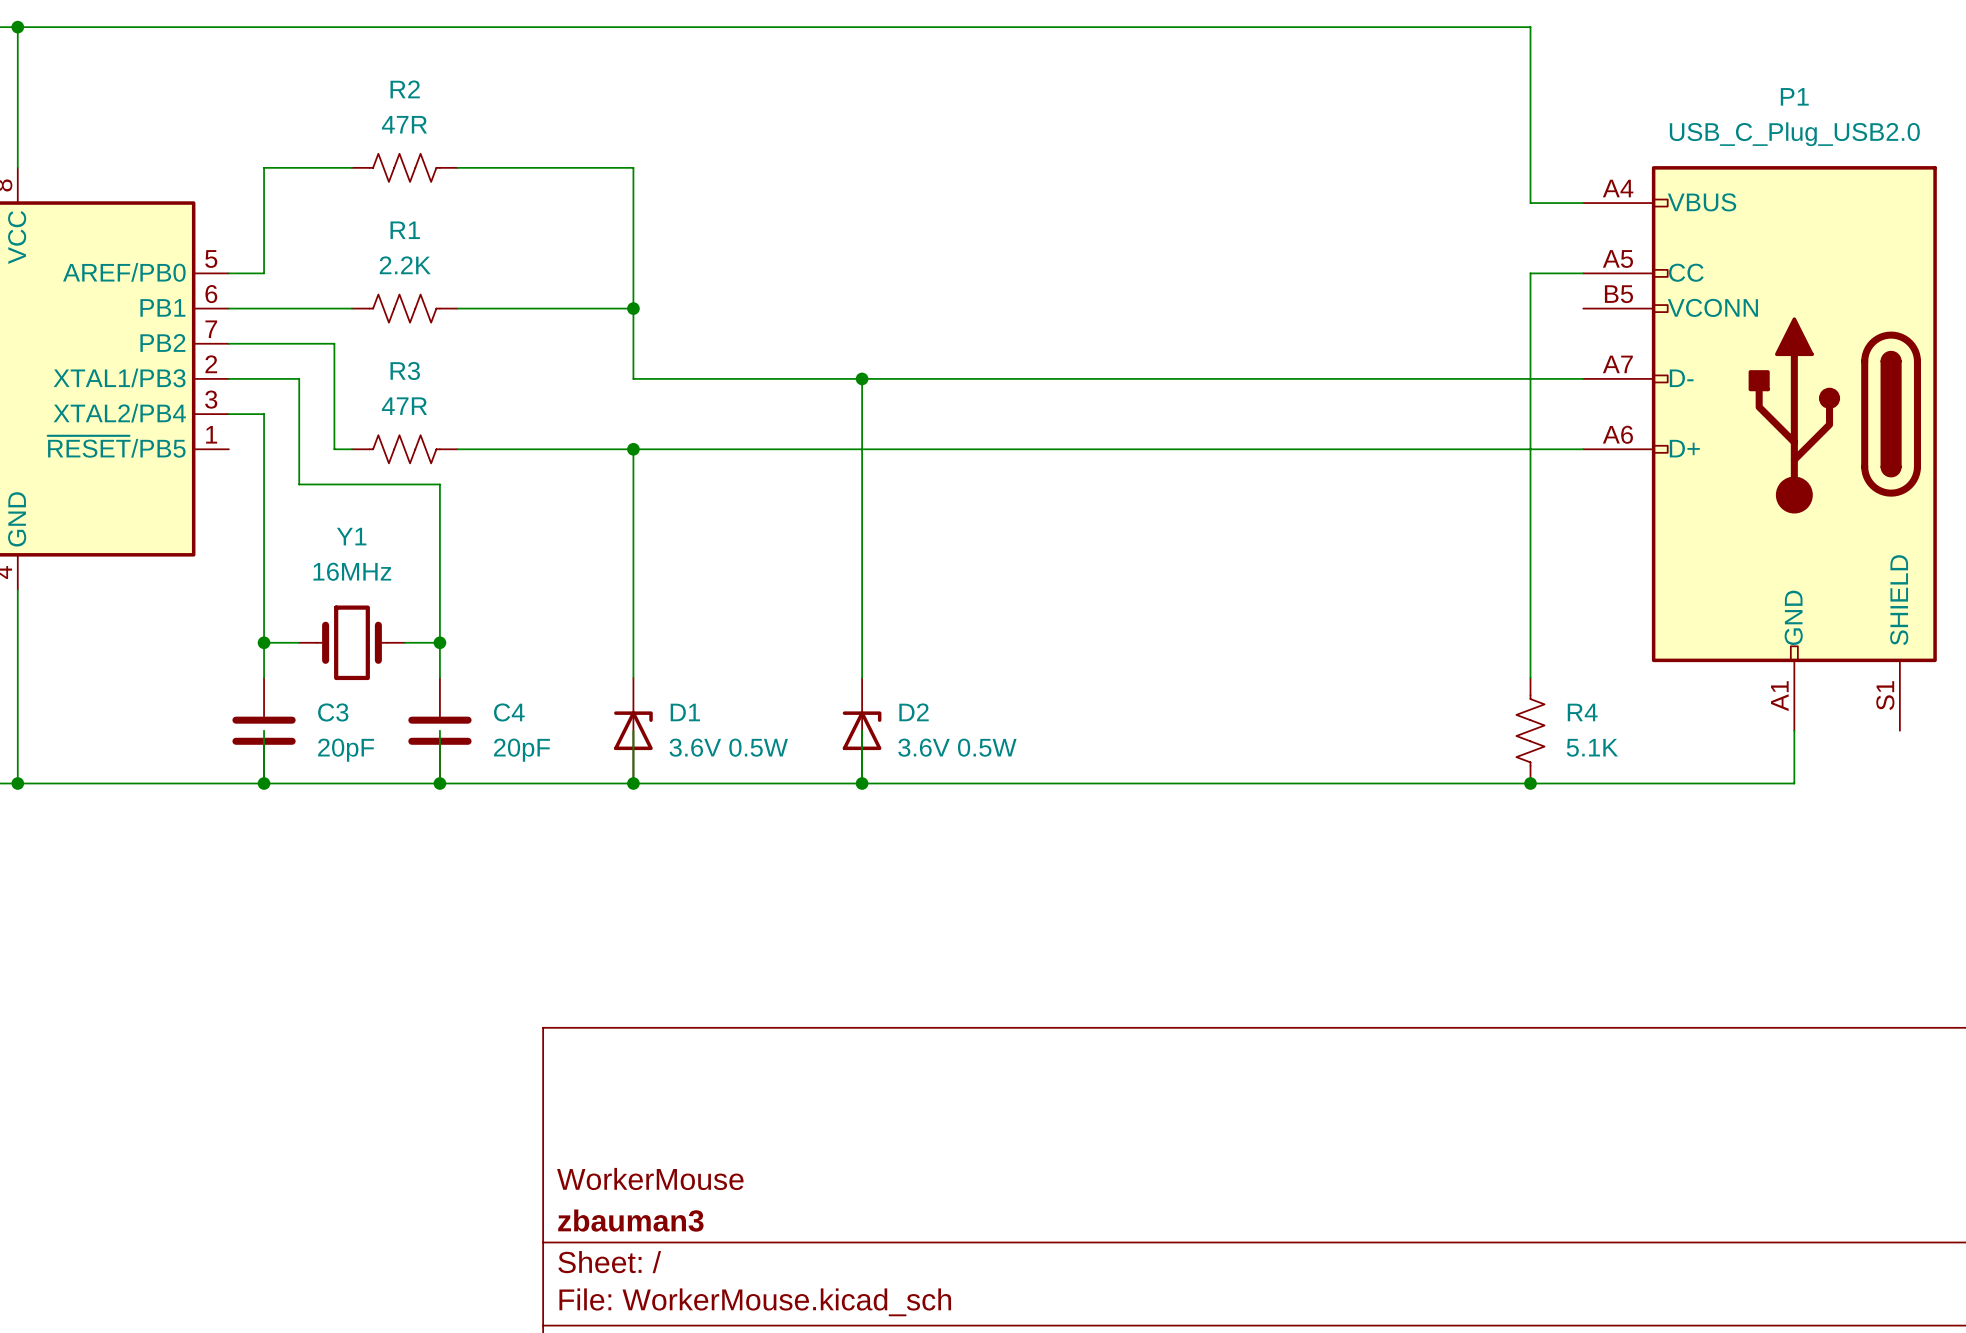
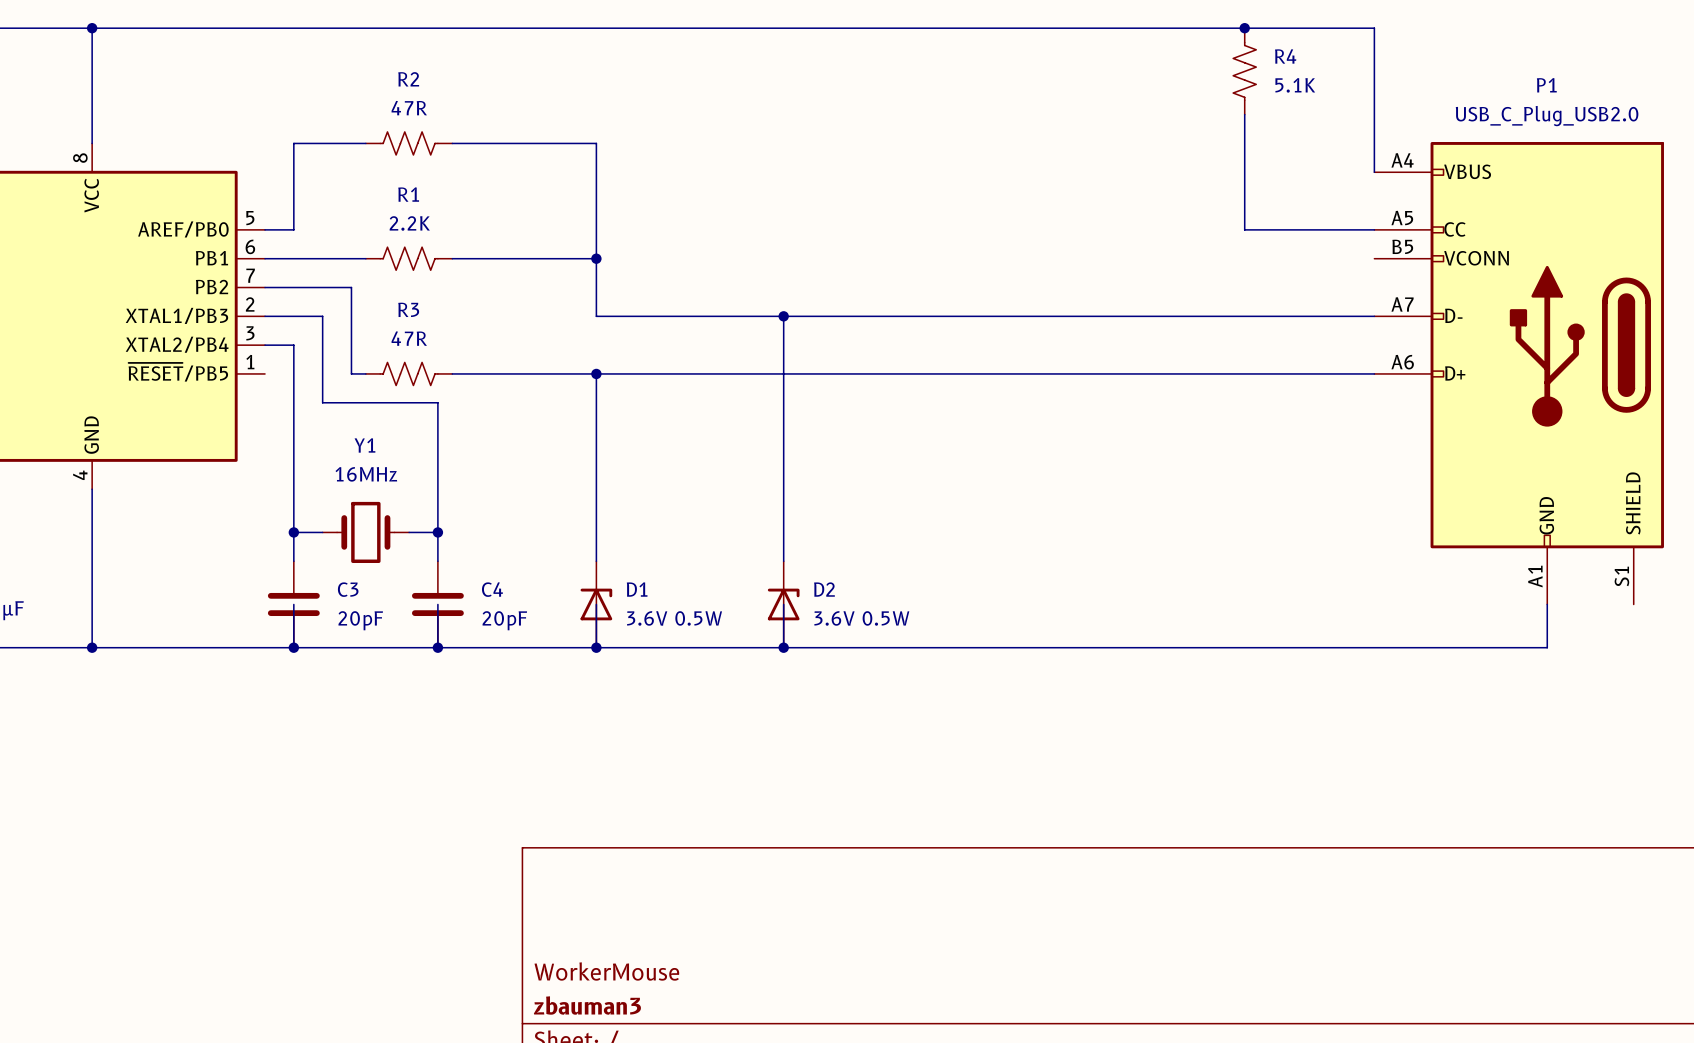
junction: none -> (1244, 28)
wire: (1530, 27) (1530, 203) (1583, 203) -> (1331, 28) (1374, 28) (1374, 172)
wire: (1530, 273) (1530, 677) -> (1331, 229) (1244, 229) (1244, 114)
R4 position: (1530, 730) -> (1244, 71)
junction: (1530, 783) -> none

